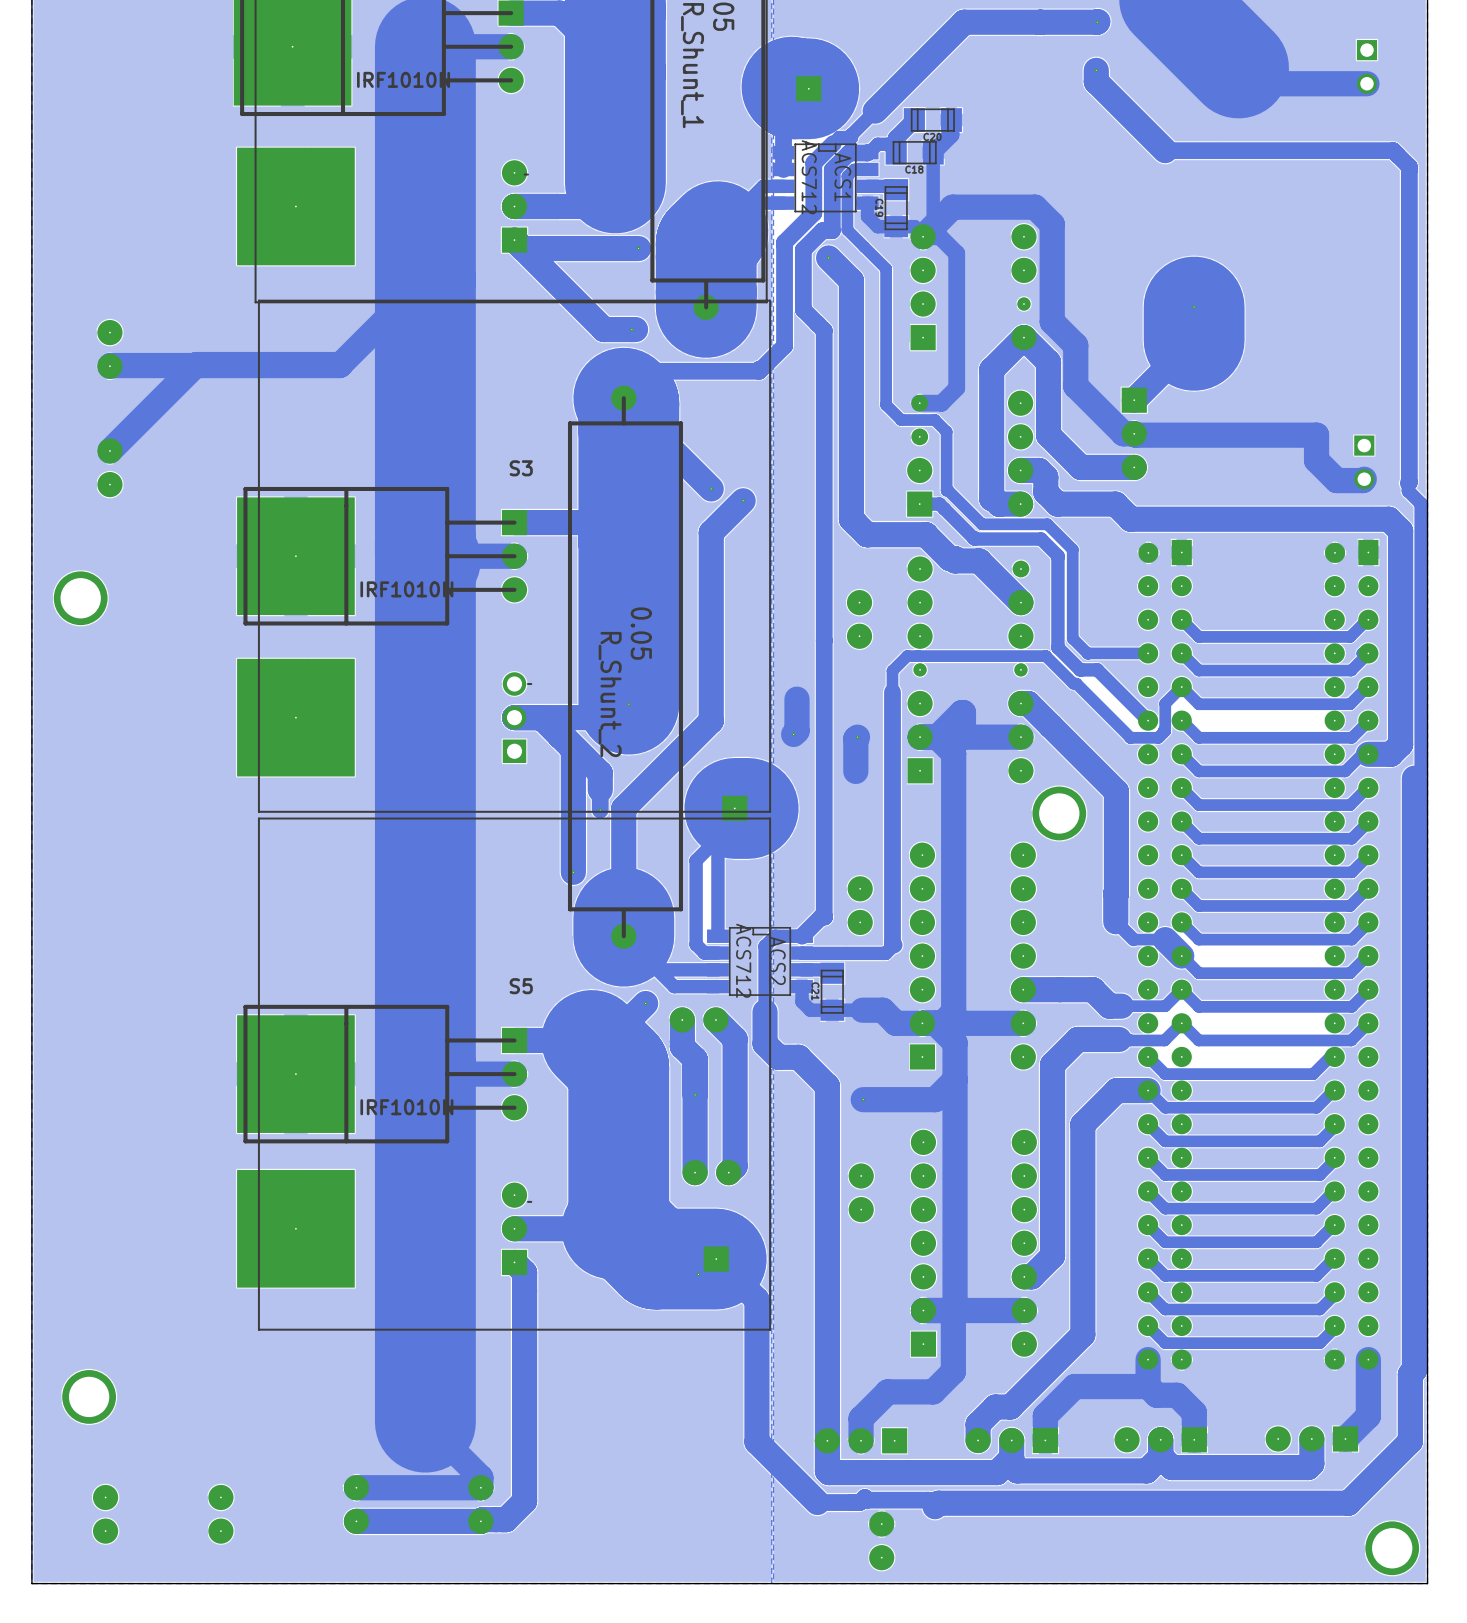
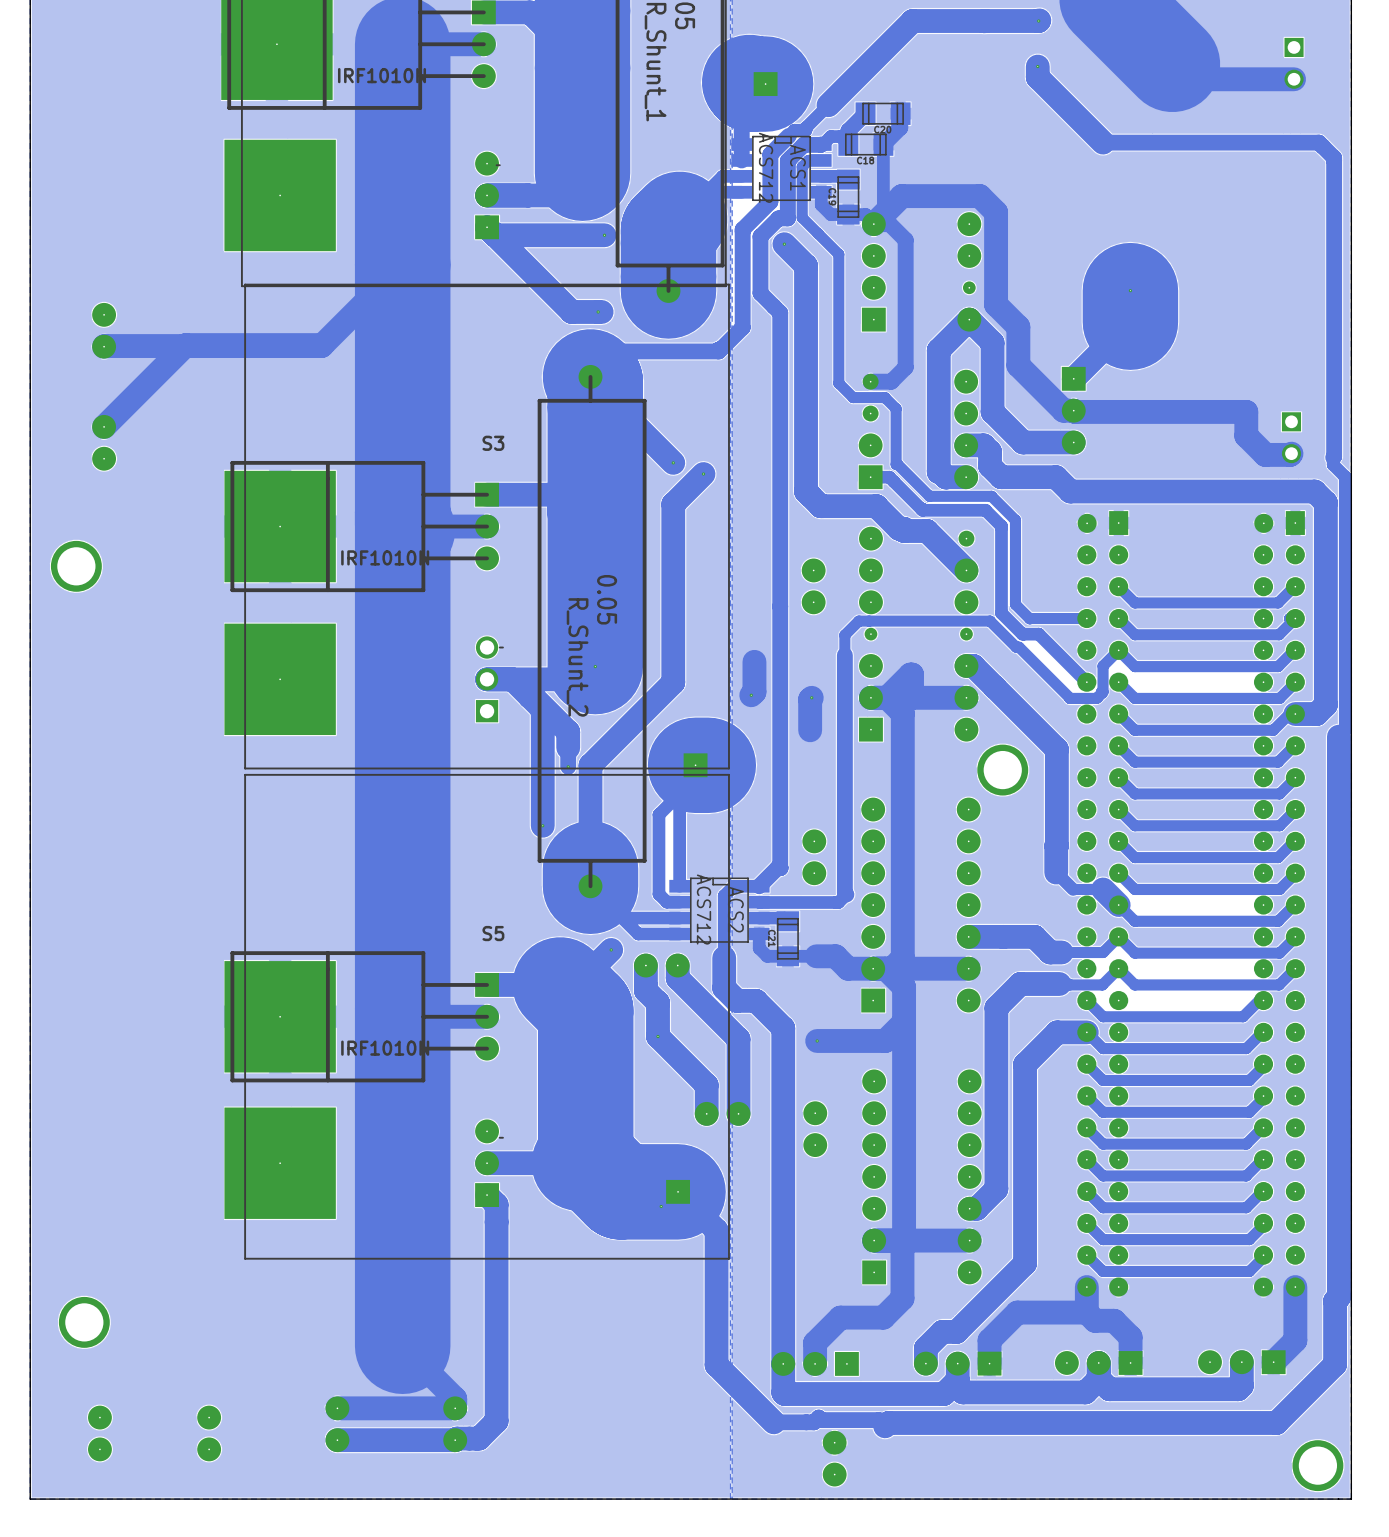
track: (715, 1019) (735, 1039) (735, 1166) (728, 1172) -> (677, 965) (677, 978) (738, 1039) (738, 1113)
track: (695, 1094) (695, 1172) -> (657, 1036) (706, 1085) (706, 1113)
part position: (711, 1172) -> (722, 1113)

